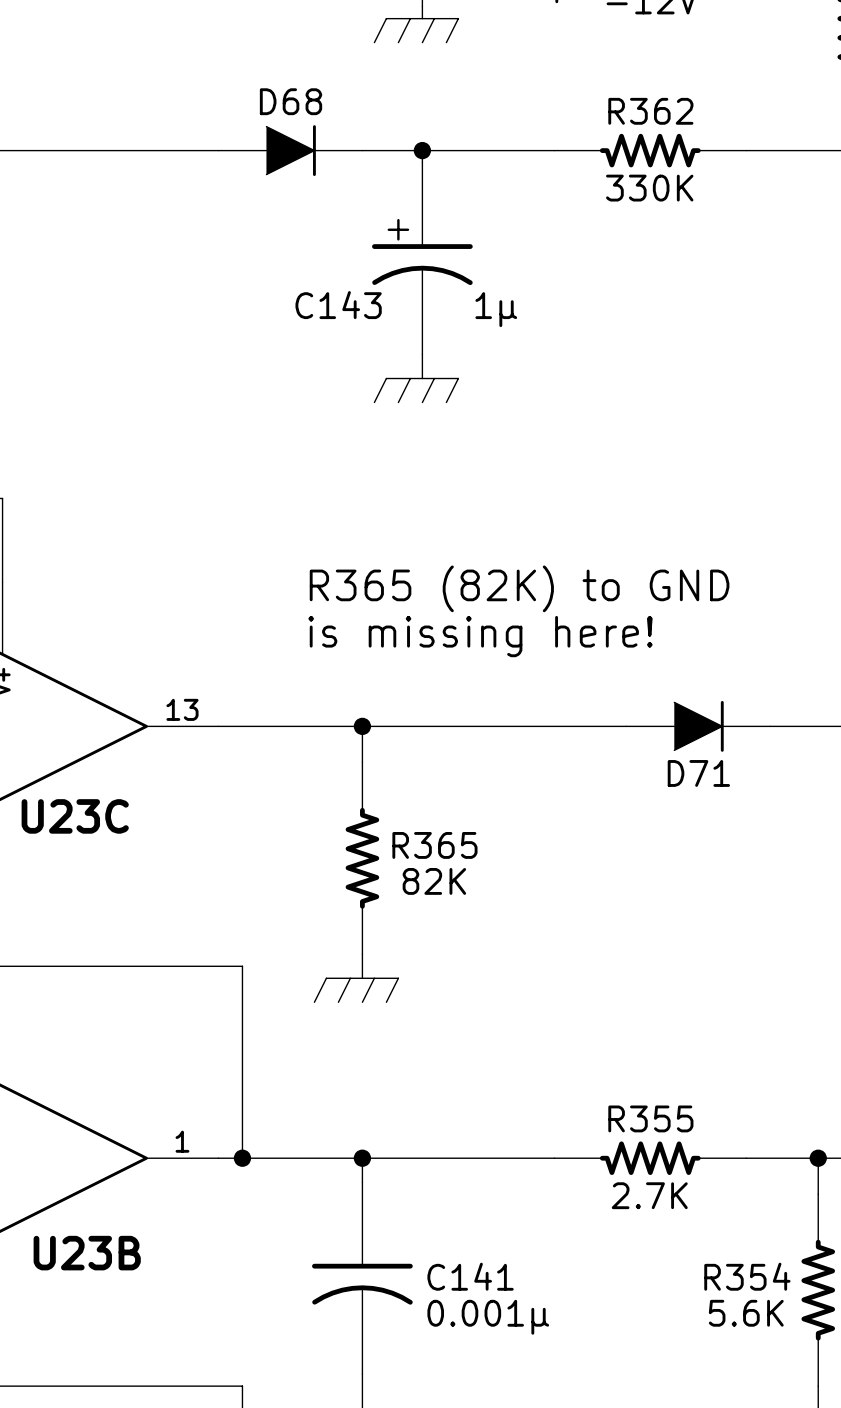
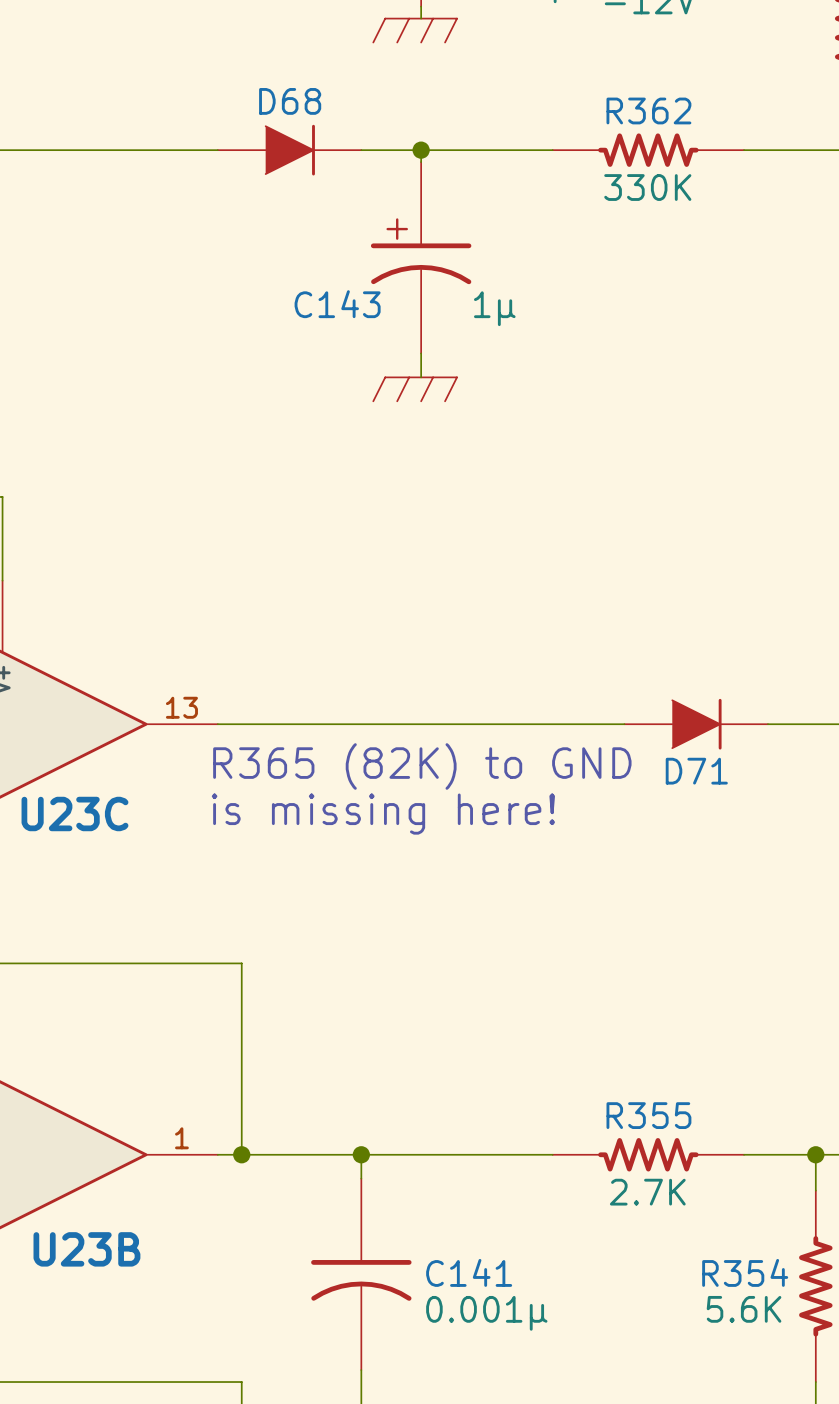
text position: R365 (82K) to GND (519, 588) -> R365 (82K) to GND (422, 766)
text position: is missing here! (480, 636) -> is missing here! (383, 814)
wire: (362, 726) (362, 762) -> none
junction: (362, 726) -> none
R365: 82K (362, 858) -> none
wire: (362, 954) (362, 978) -> none
power symbol: (356, 990) -> none

